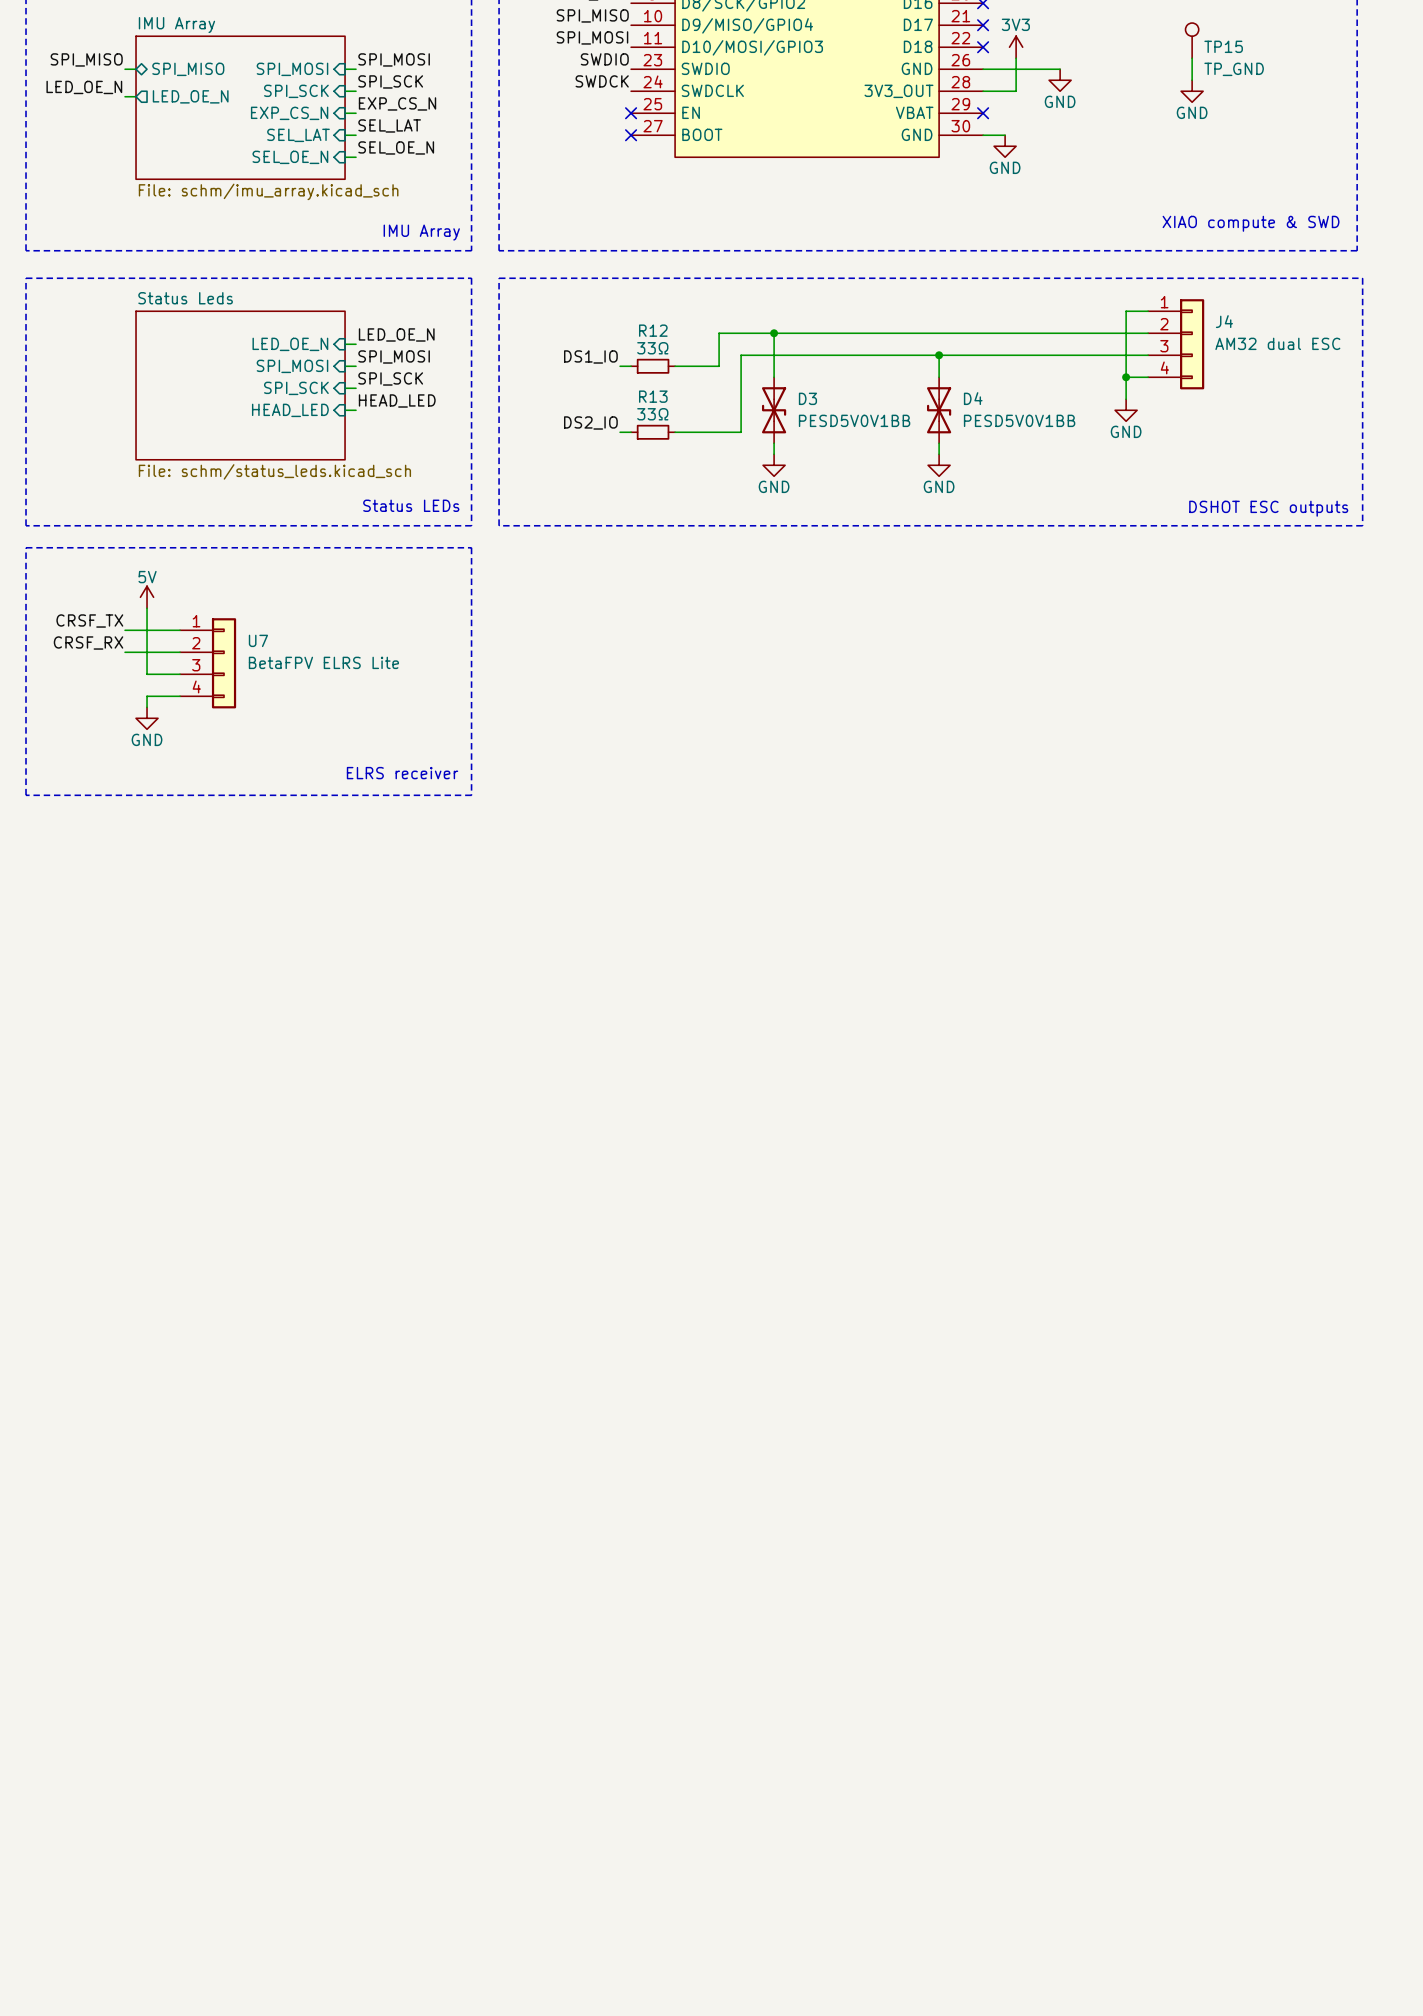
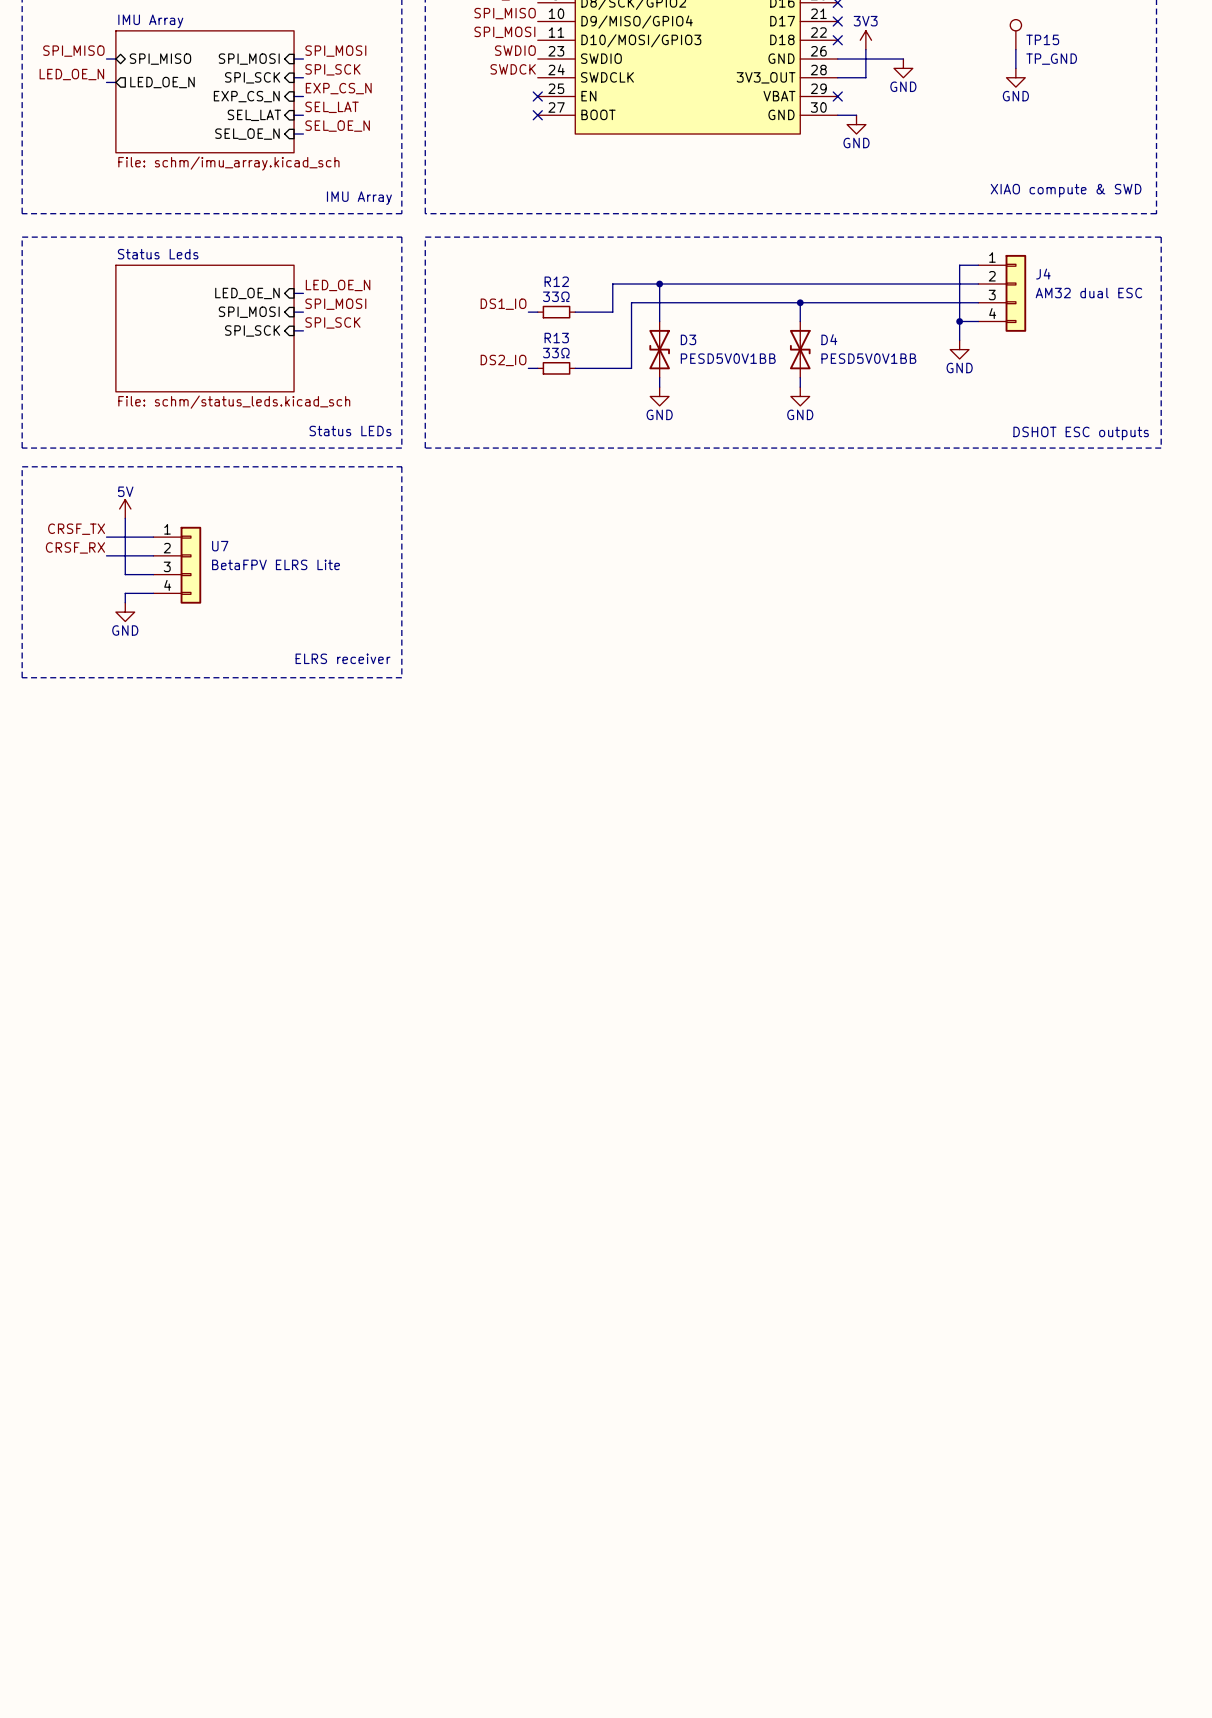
label: HEAD_LED (397, 400) -> none
sheet pin: HEAD_LED (290, 410) -> none
wire: (345, 410) (356, 410) -> none

